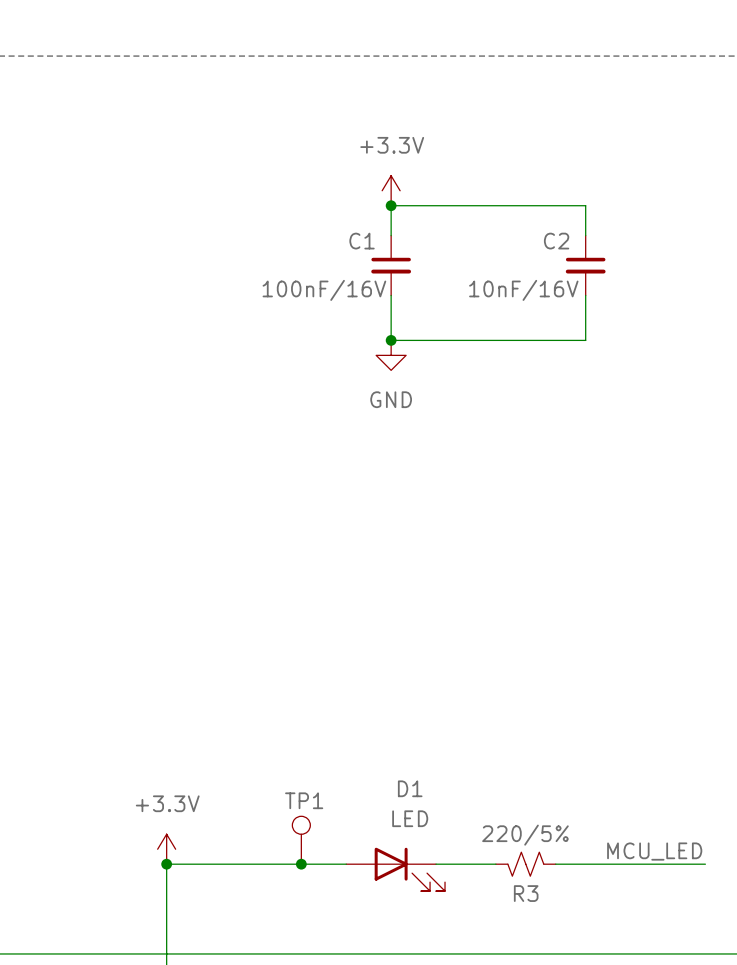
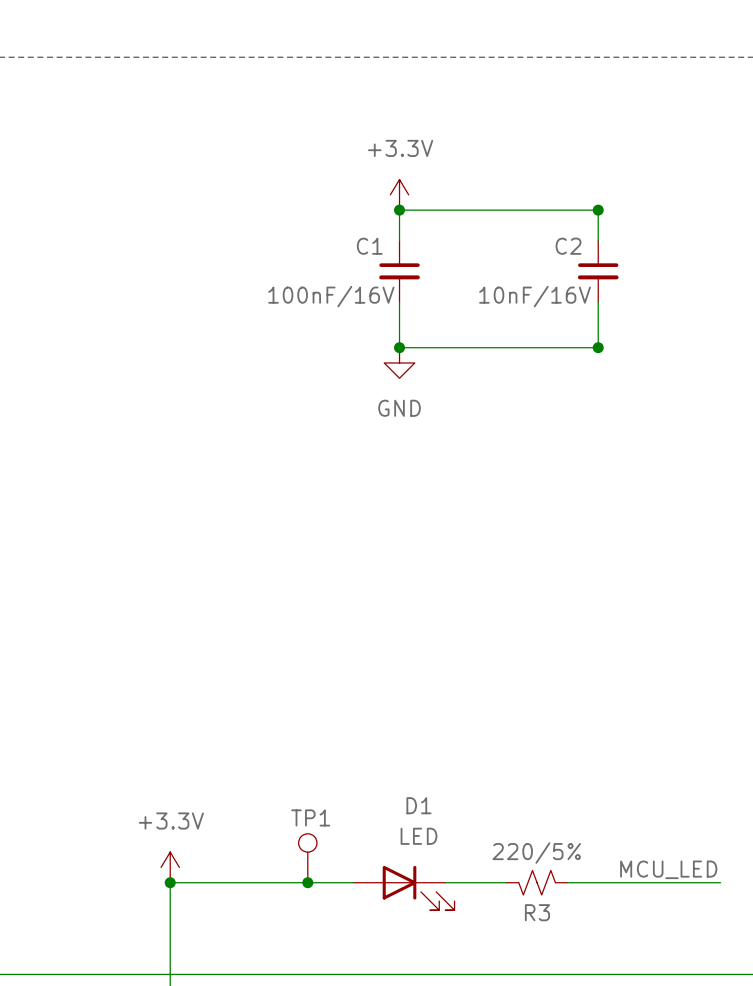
junction: none -> (598, 210)
junction: none -> (598, 347)

